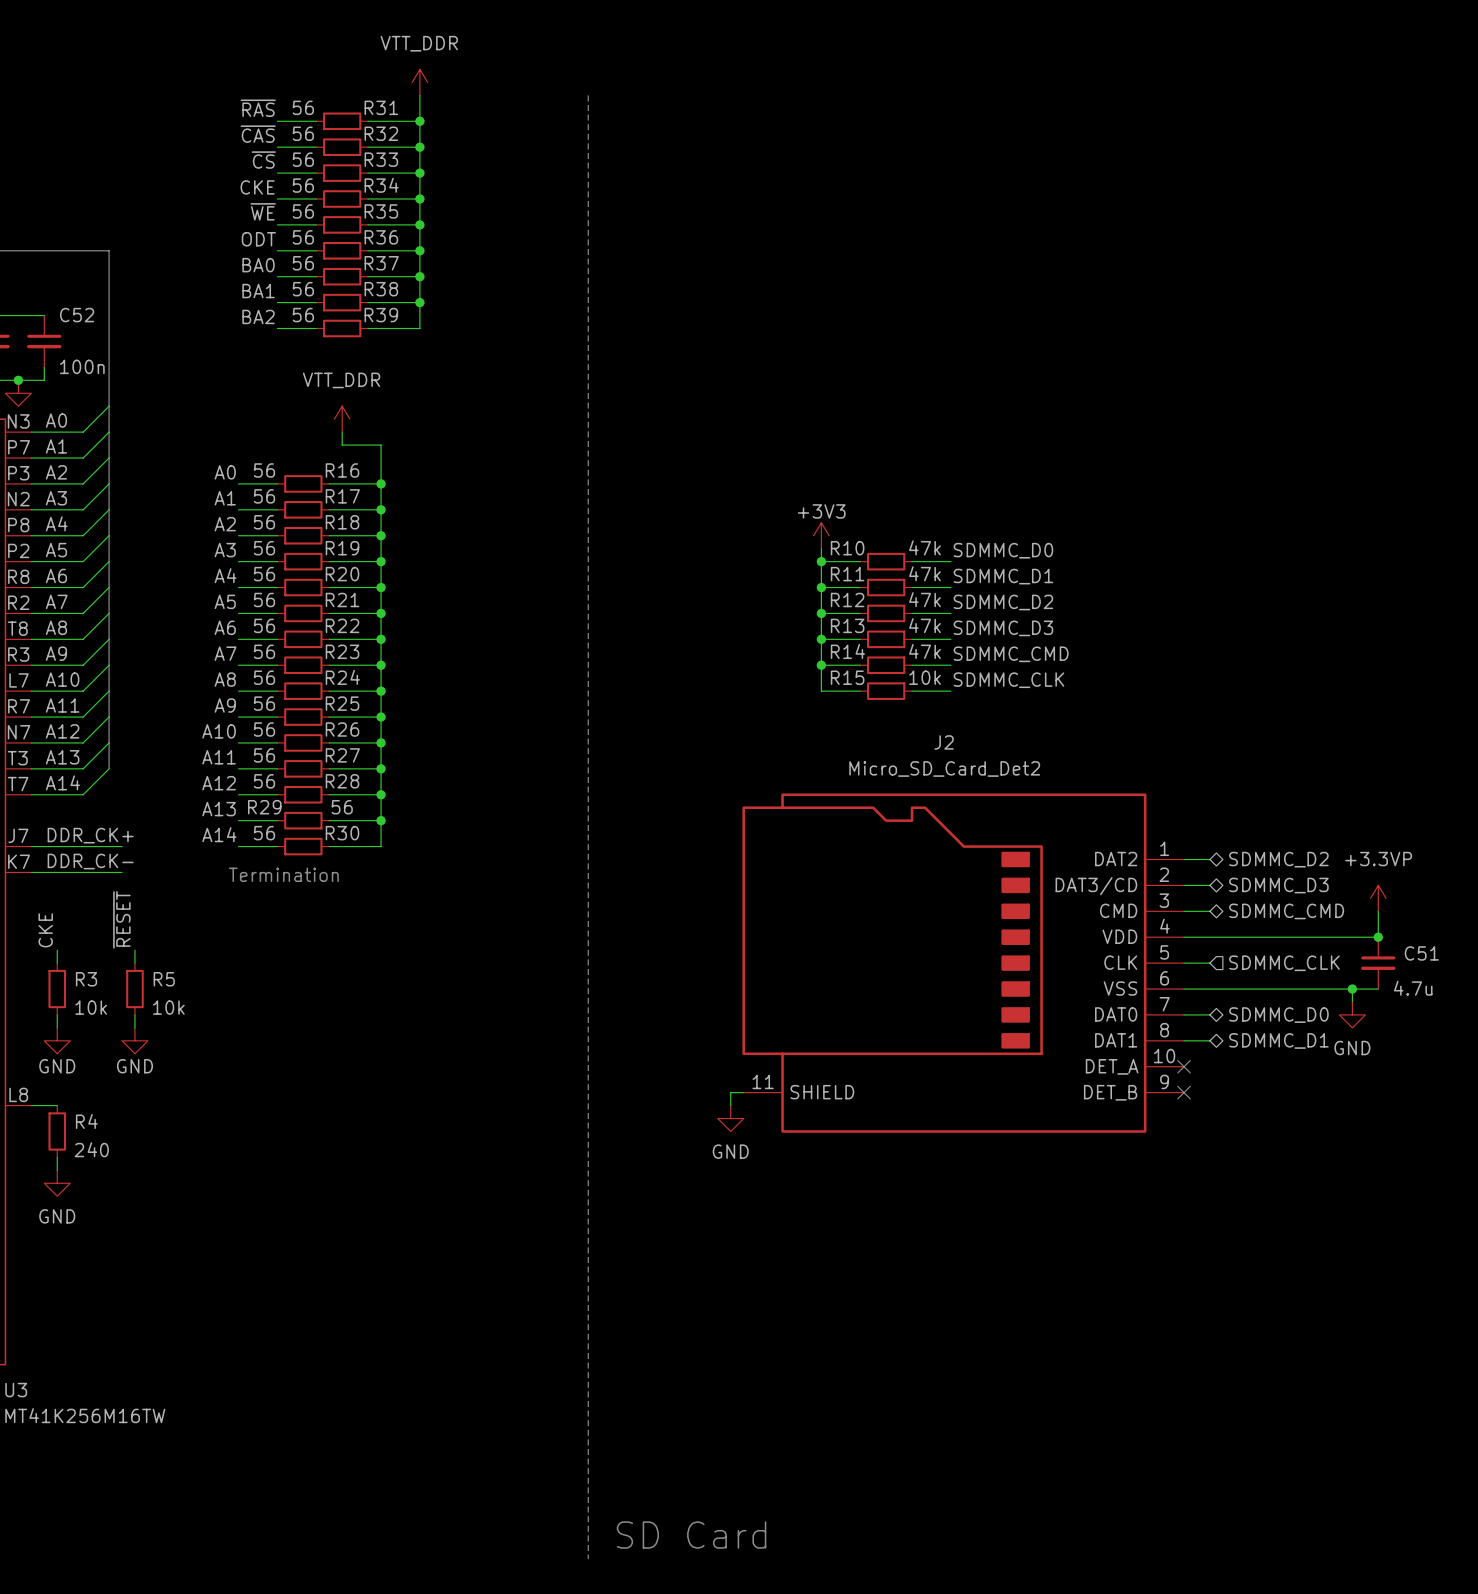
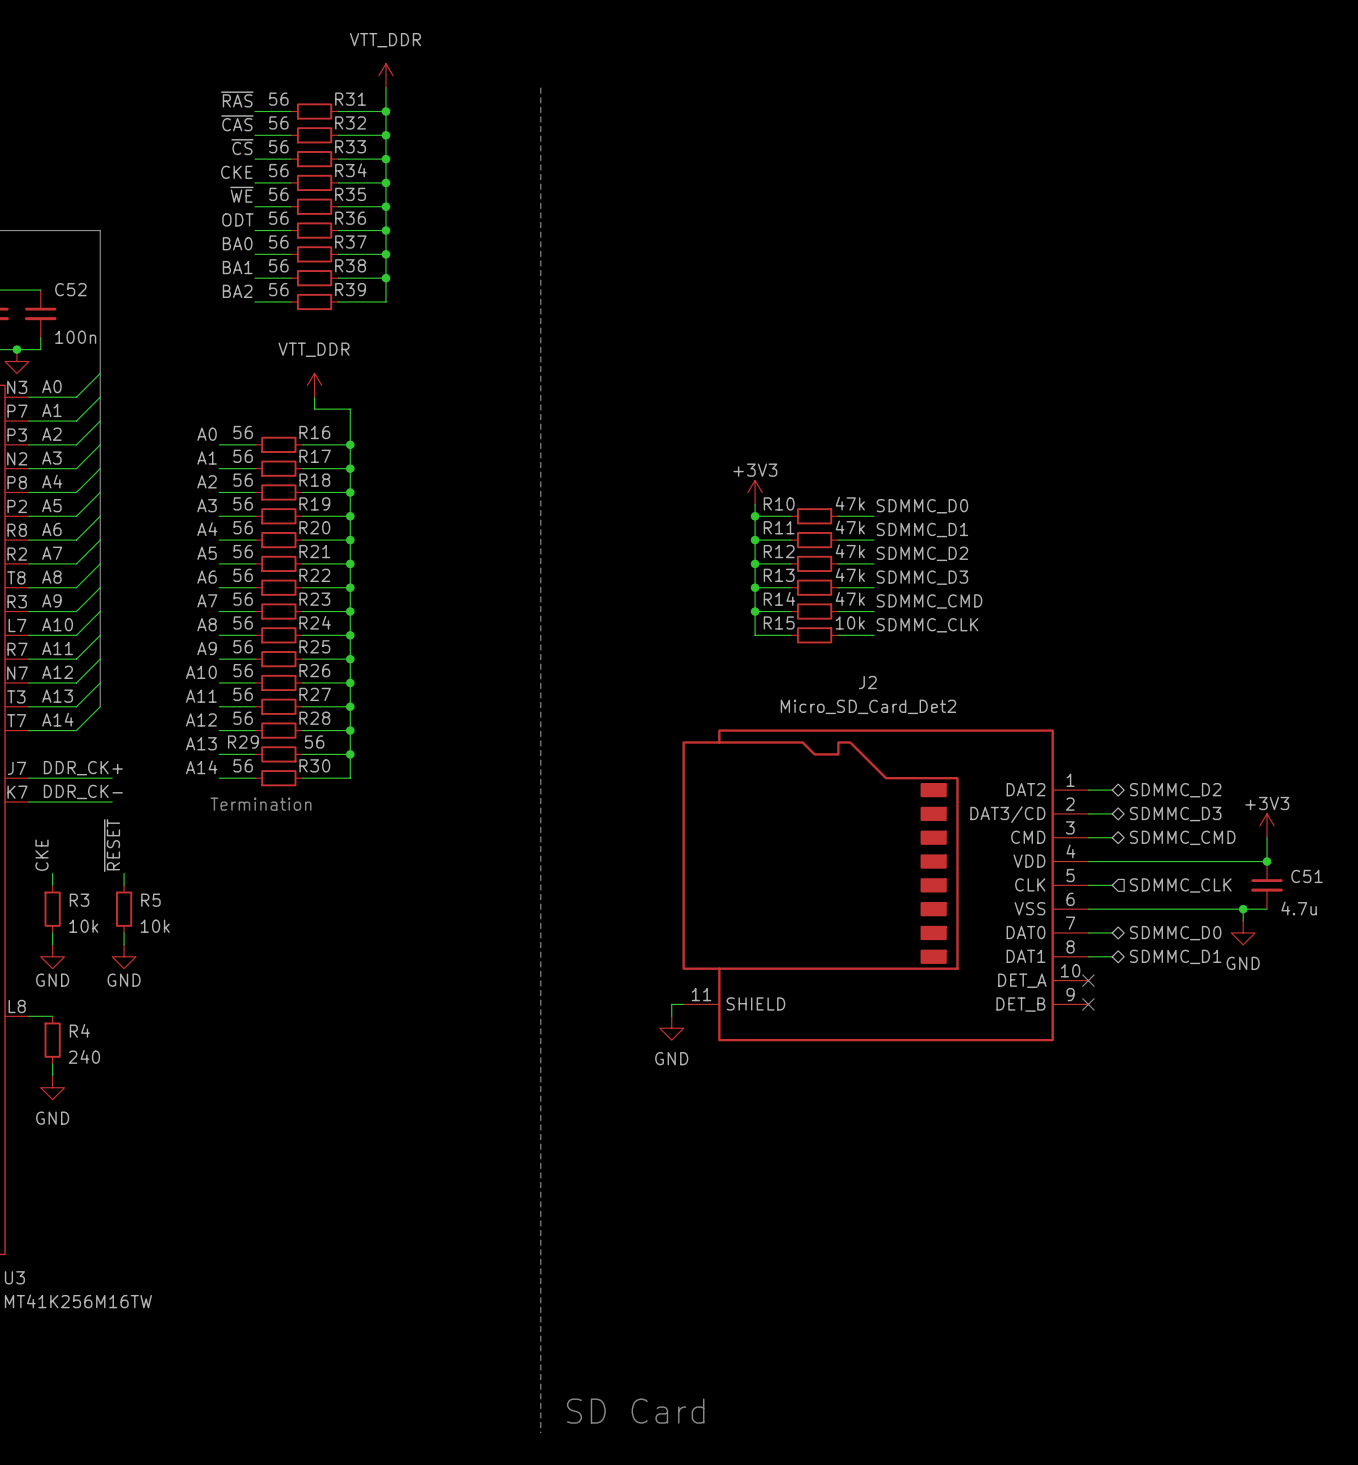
power symbol: +3.3VP (1378, 898) -> +3V3 (1267, 825)

